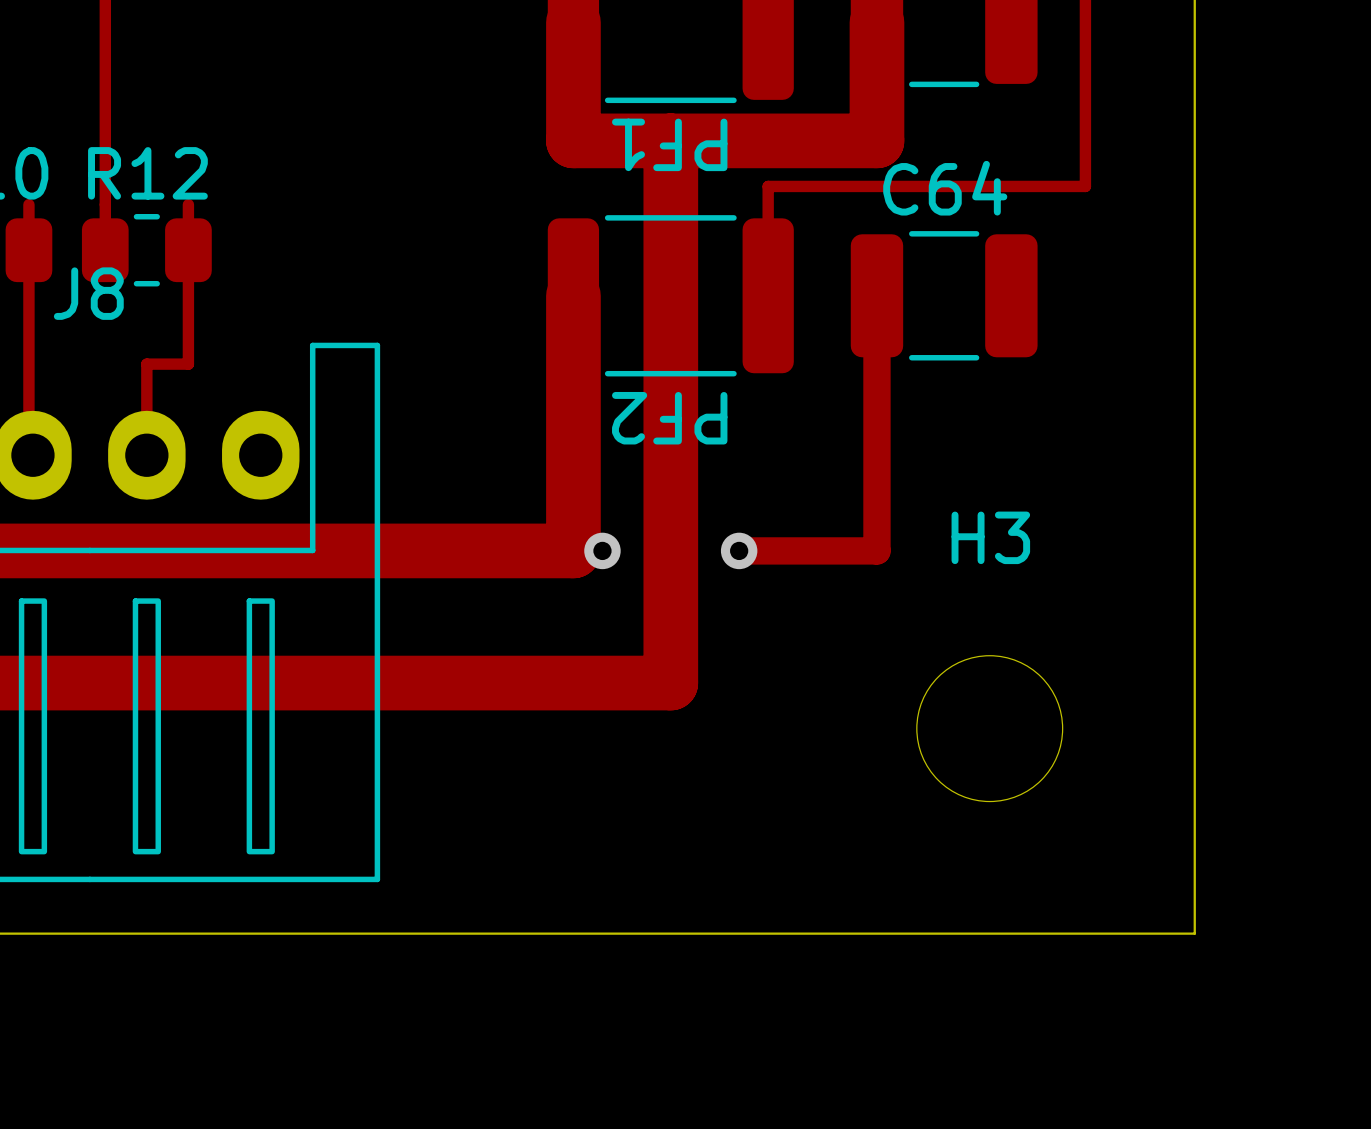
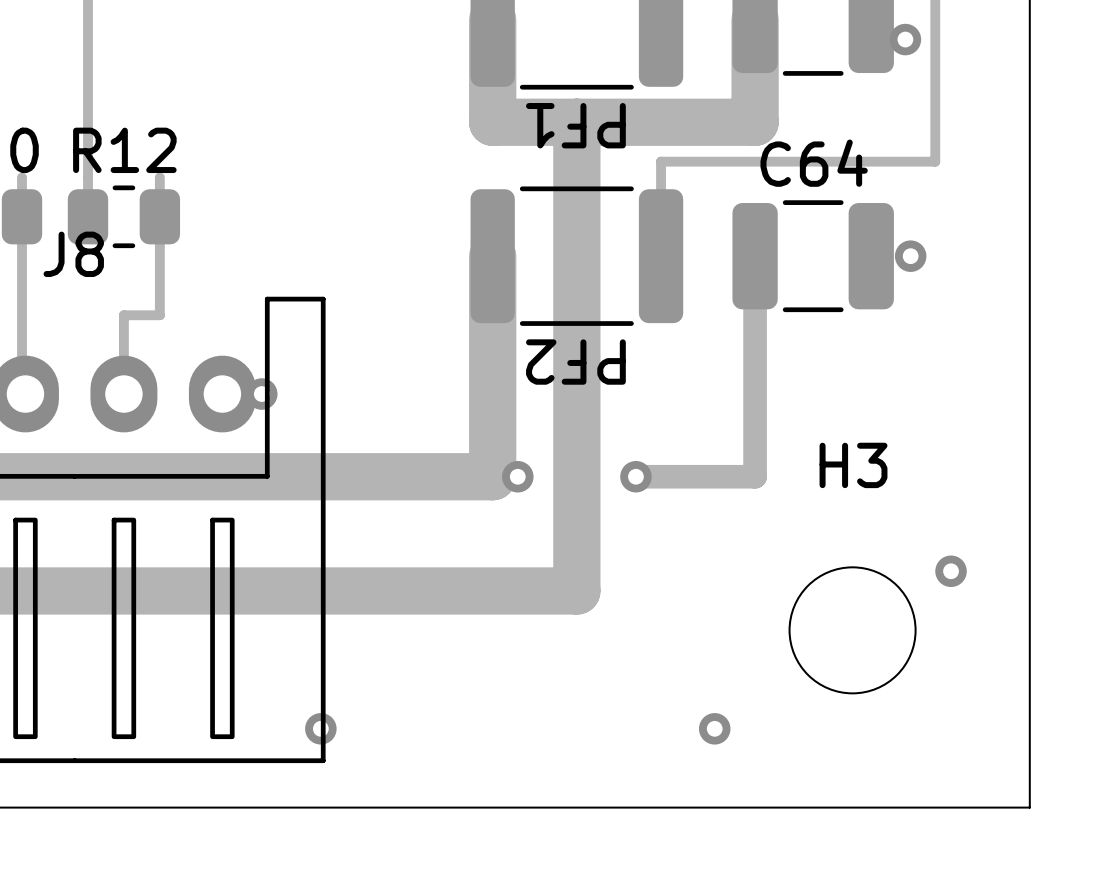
via: none -> (905, 39)
via: none -> (910, 256)
via: none -> (261, 394)
via: none -> (951, 571)
via: none -> (320, 728)
via: none -> (714, 728)

